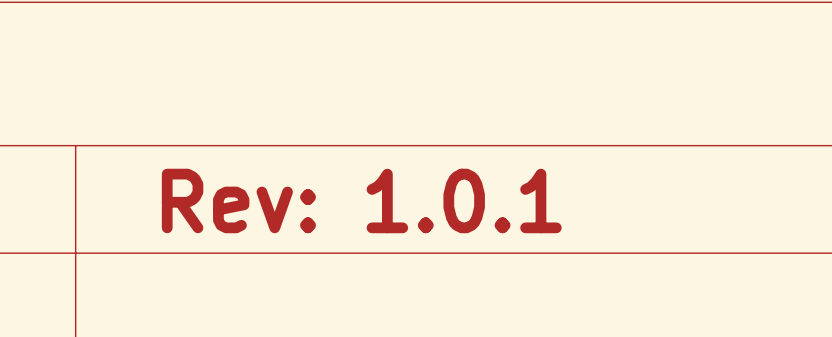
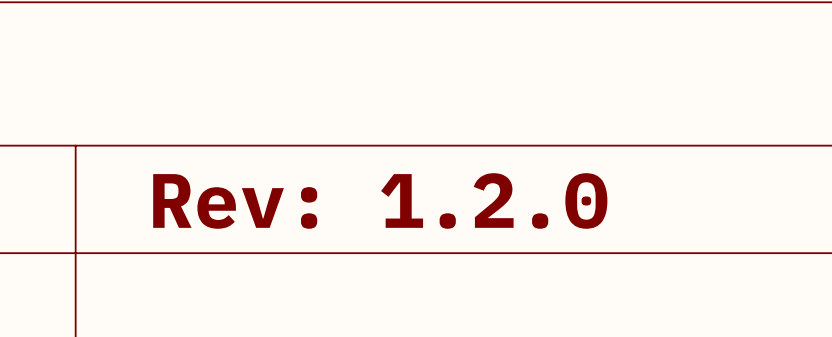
title block: Rev: 1.0.1 (361, 200) -> Rev: 1.2.0 (380, 200)

